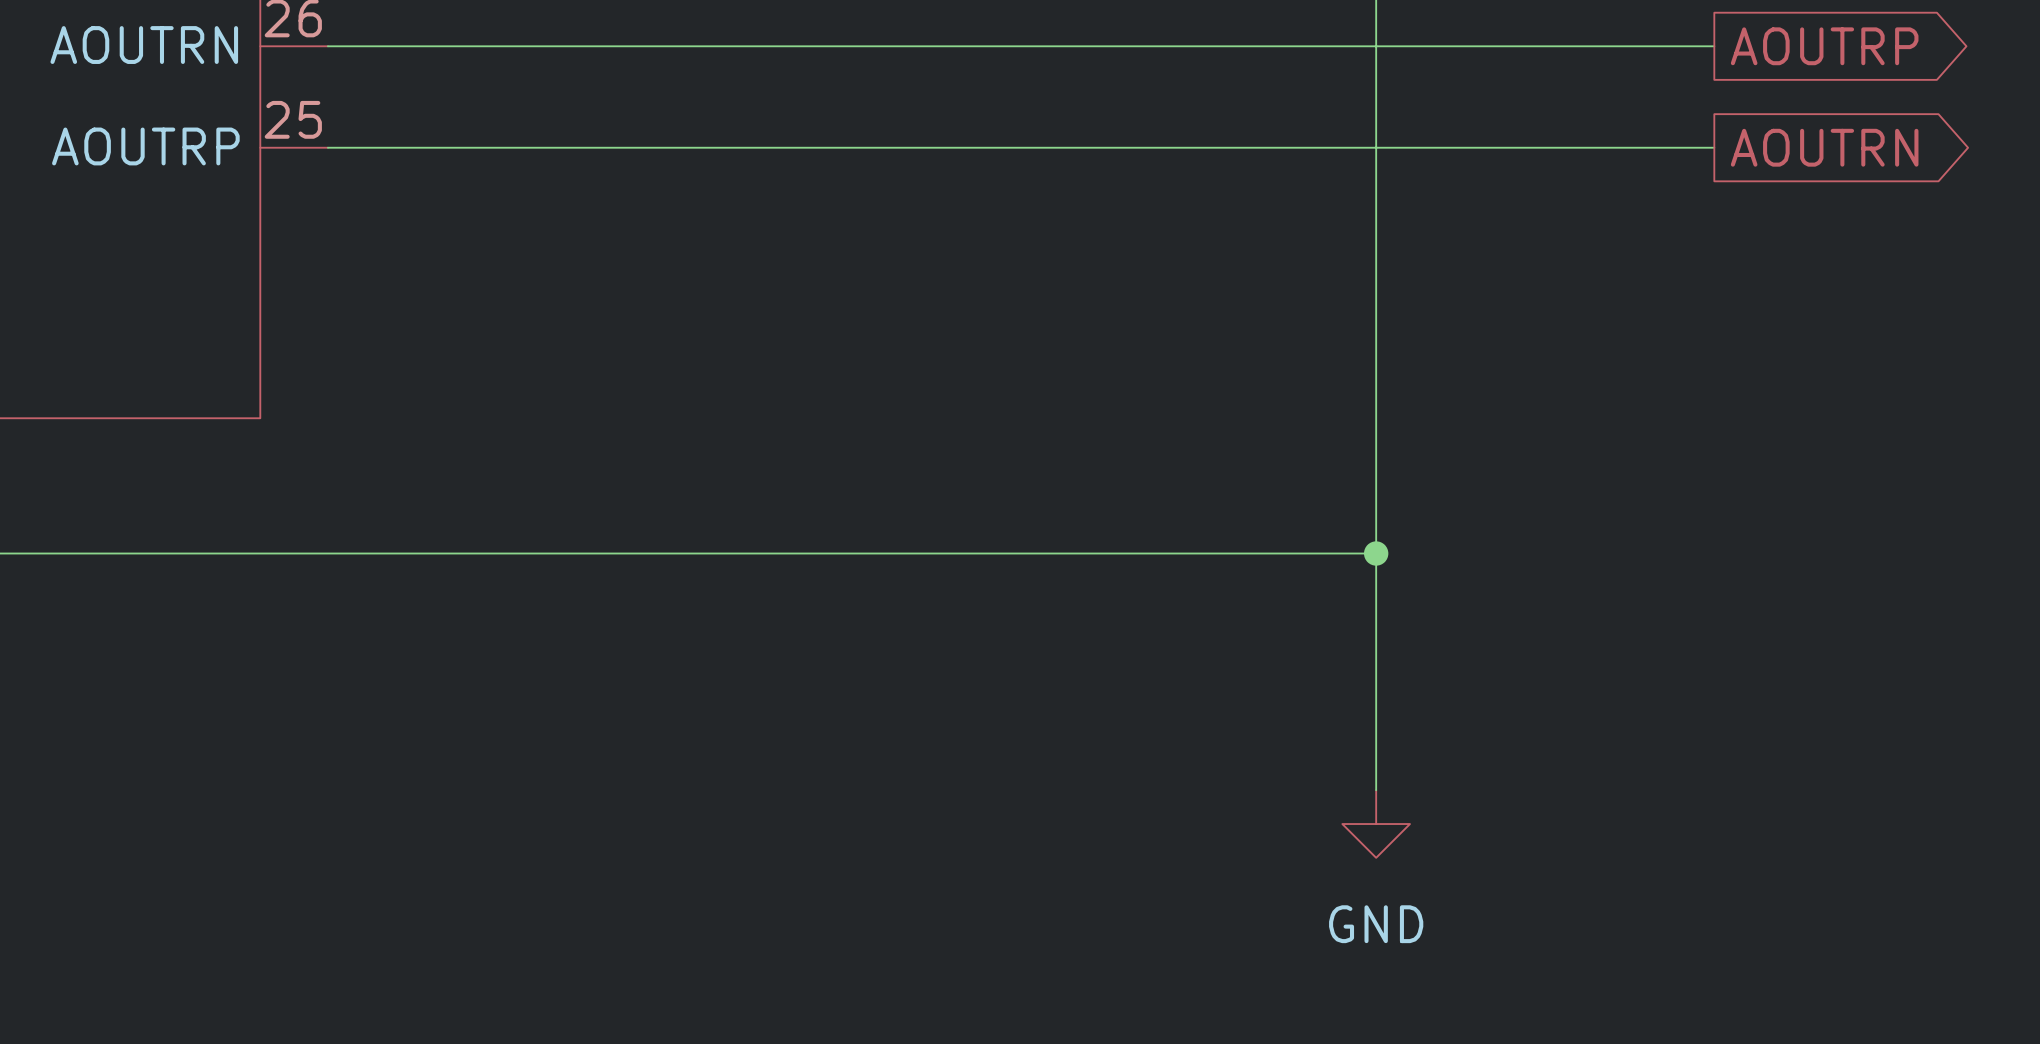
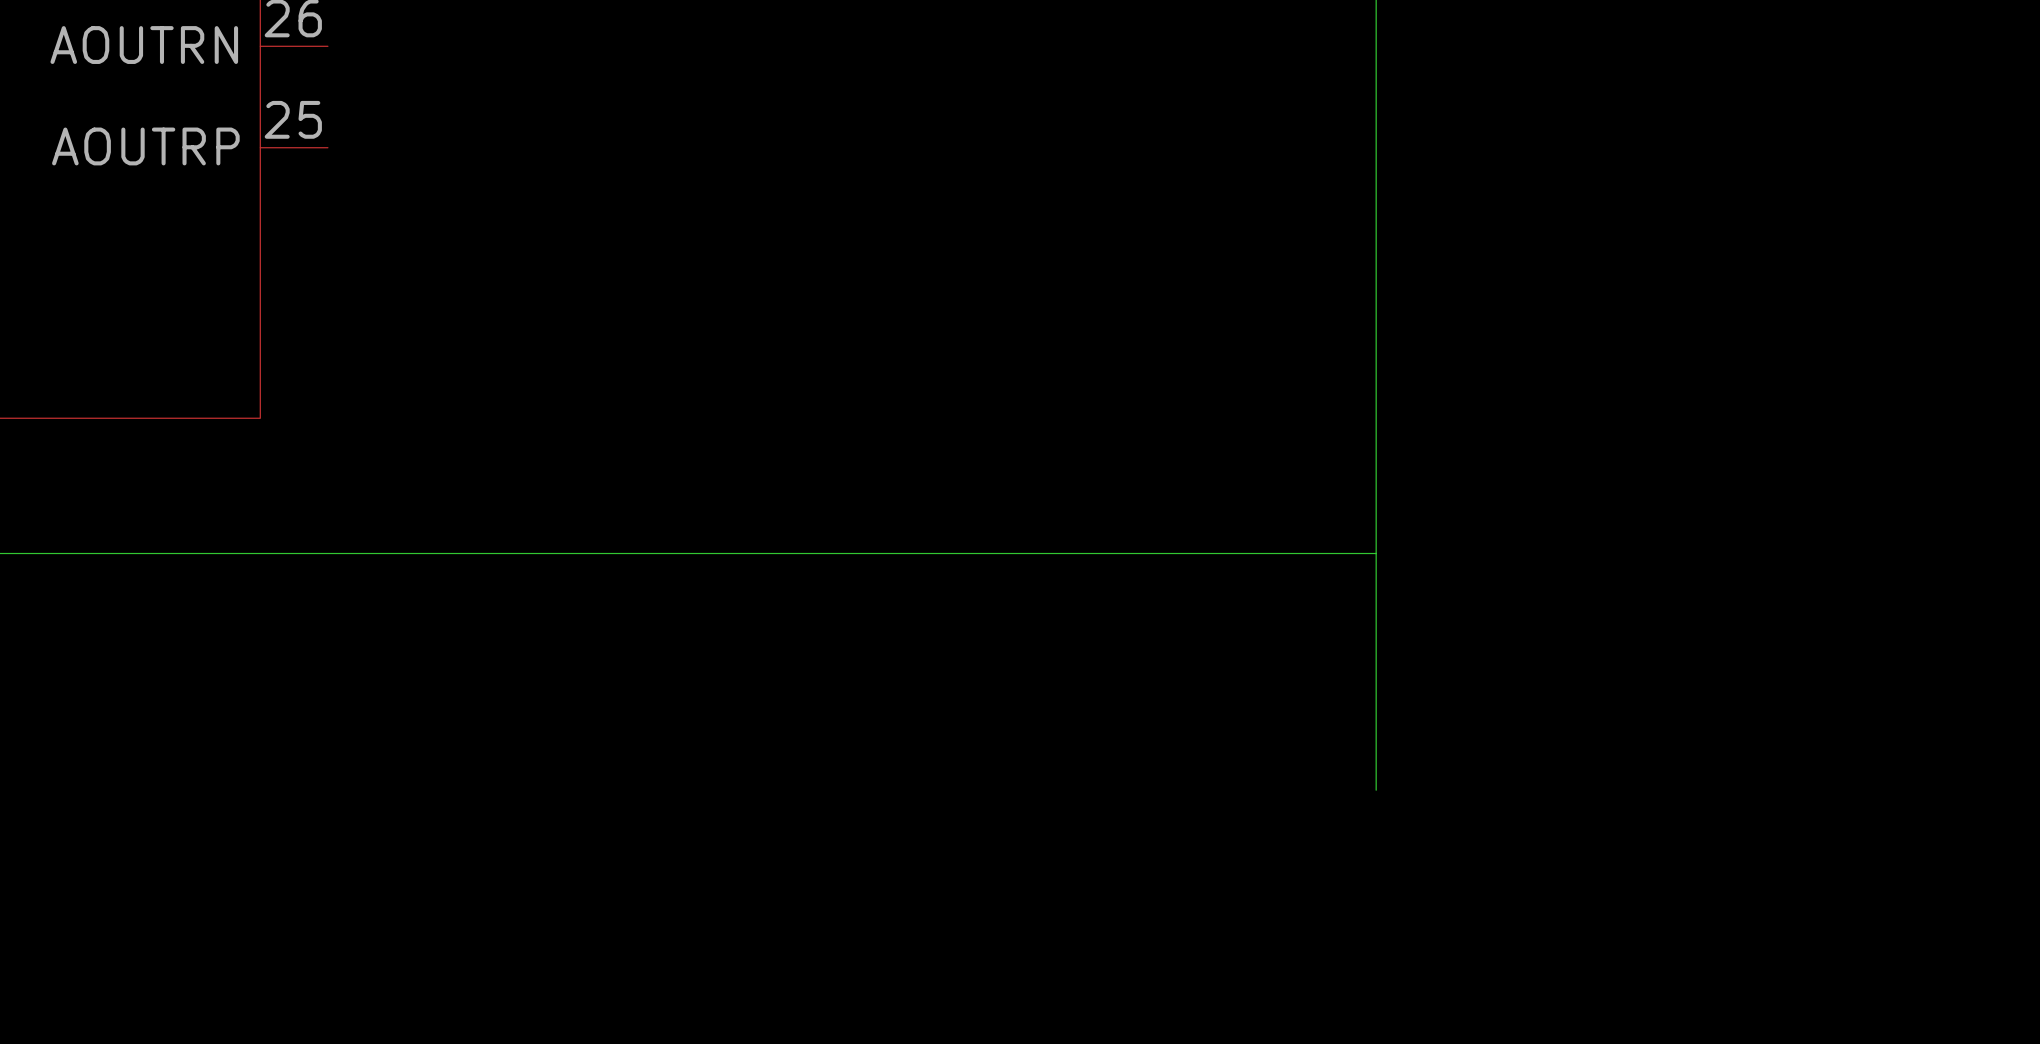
wire: (327, 46) (1714, 46) -> none
global label: AOUTRP (1824, 46) -> none
wire: (327, 147) (1714, 147) -> none
global label: AOUTRN (1824, 147) -> none
junction: (1376, 553) -> none
power symbol: GND (1376, 824) -> none

